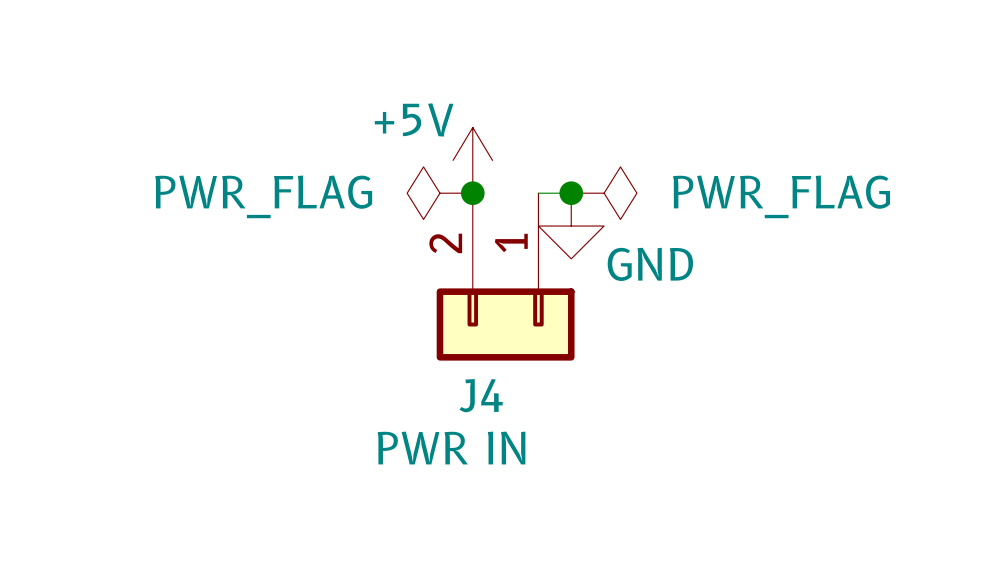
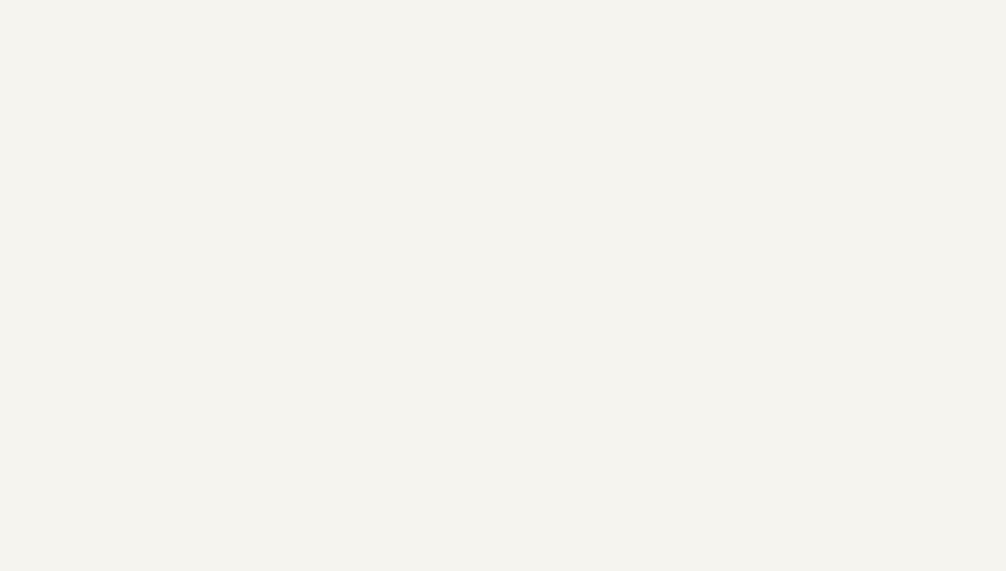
power symbol: +5V (472, 160) -> none
power symbol: PWR_FLAG (439, 193) -> none
junction: (472, 193) -> none
wire: (538, 193) (571, 193) -> none
junction: (571, 193) -> none
power symbol: PWR_FLAG (604, 193) -> none
power symbol: GND (571, 226) -> none
J4: PWR IN (505, 276) -> none

